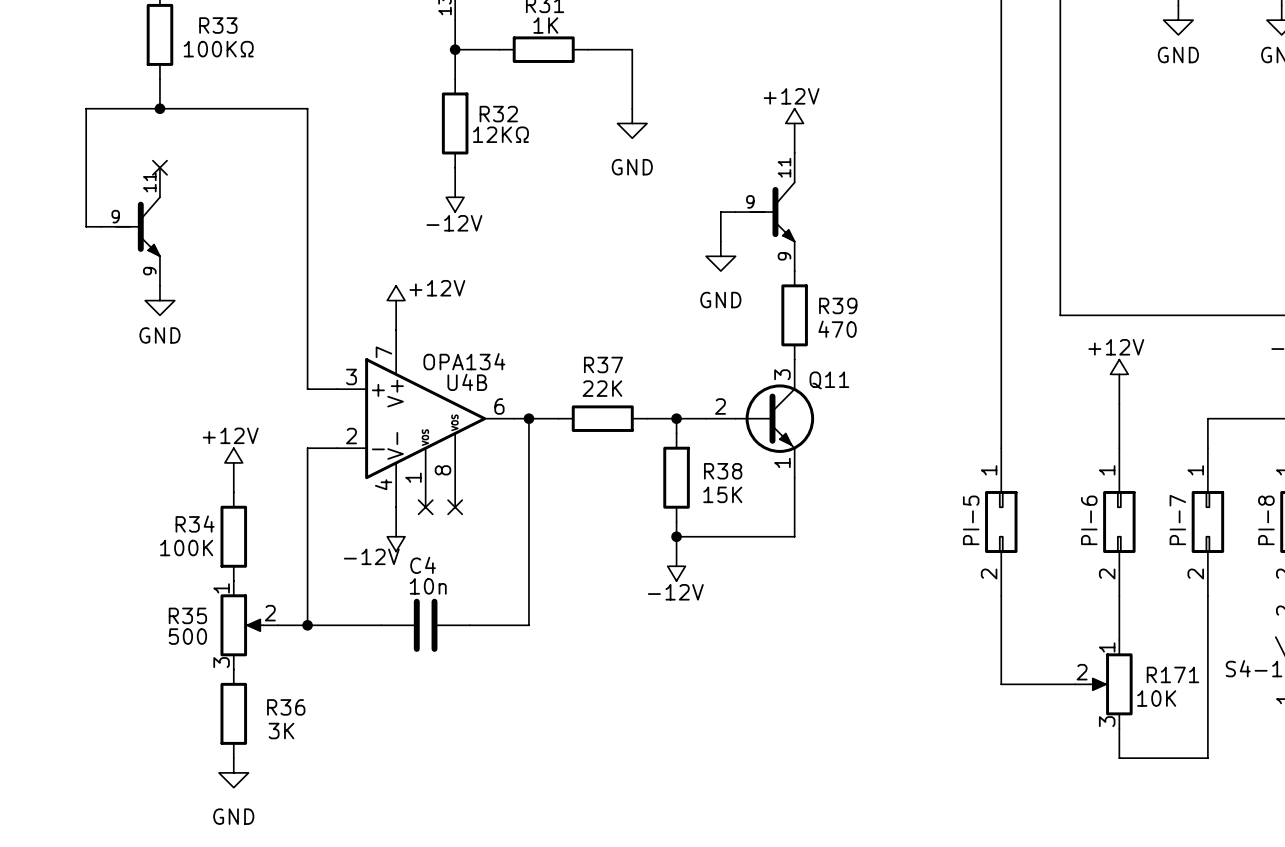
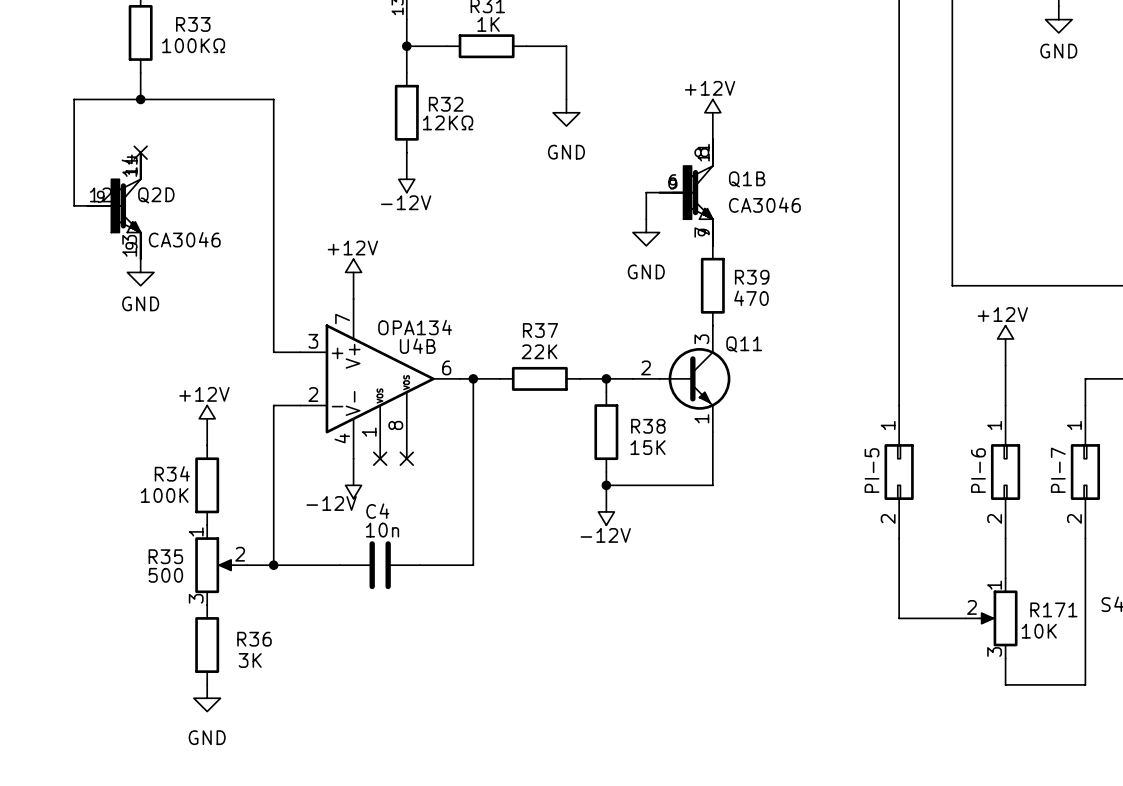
Q1B: none -> CA3046 (686, 192)
Q2D: none -> CA3046 (114, 205)
part value position: +12V (437, 288) -> +12V (352, 248)

